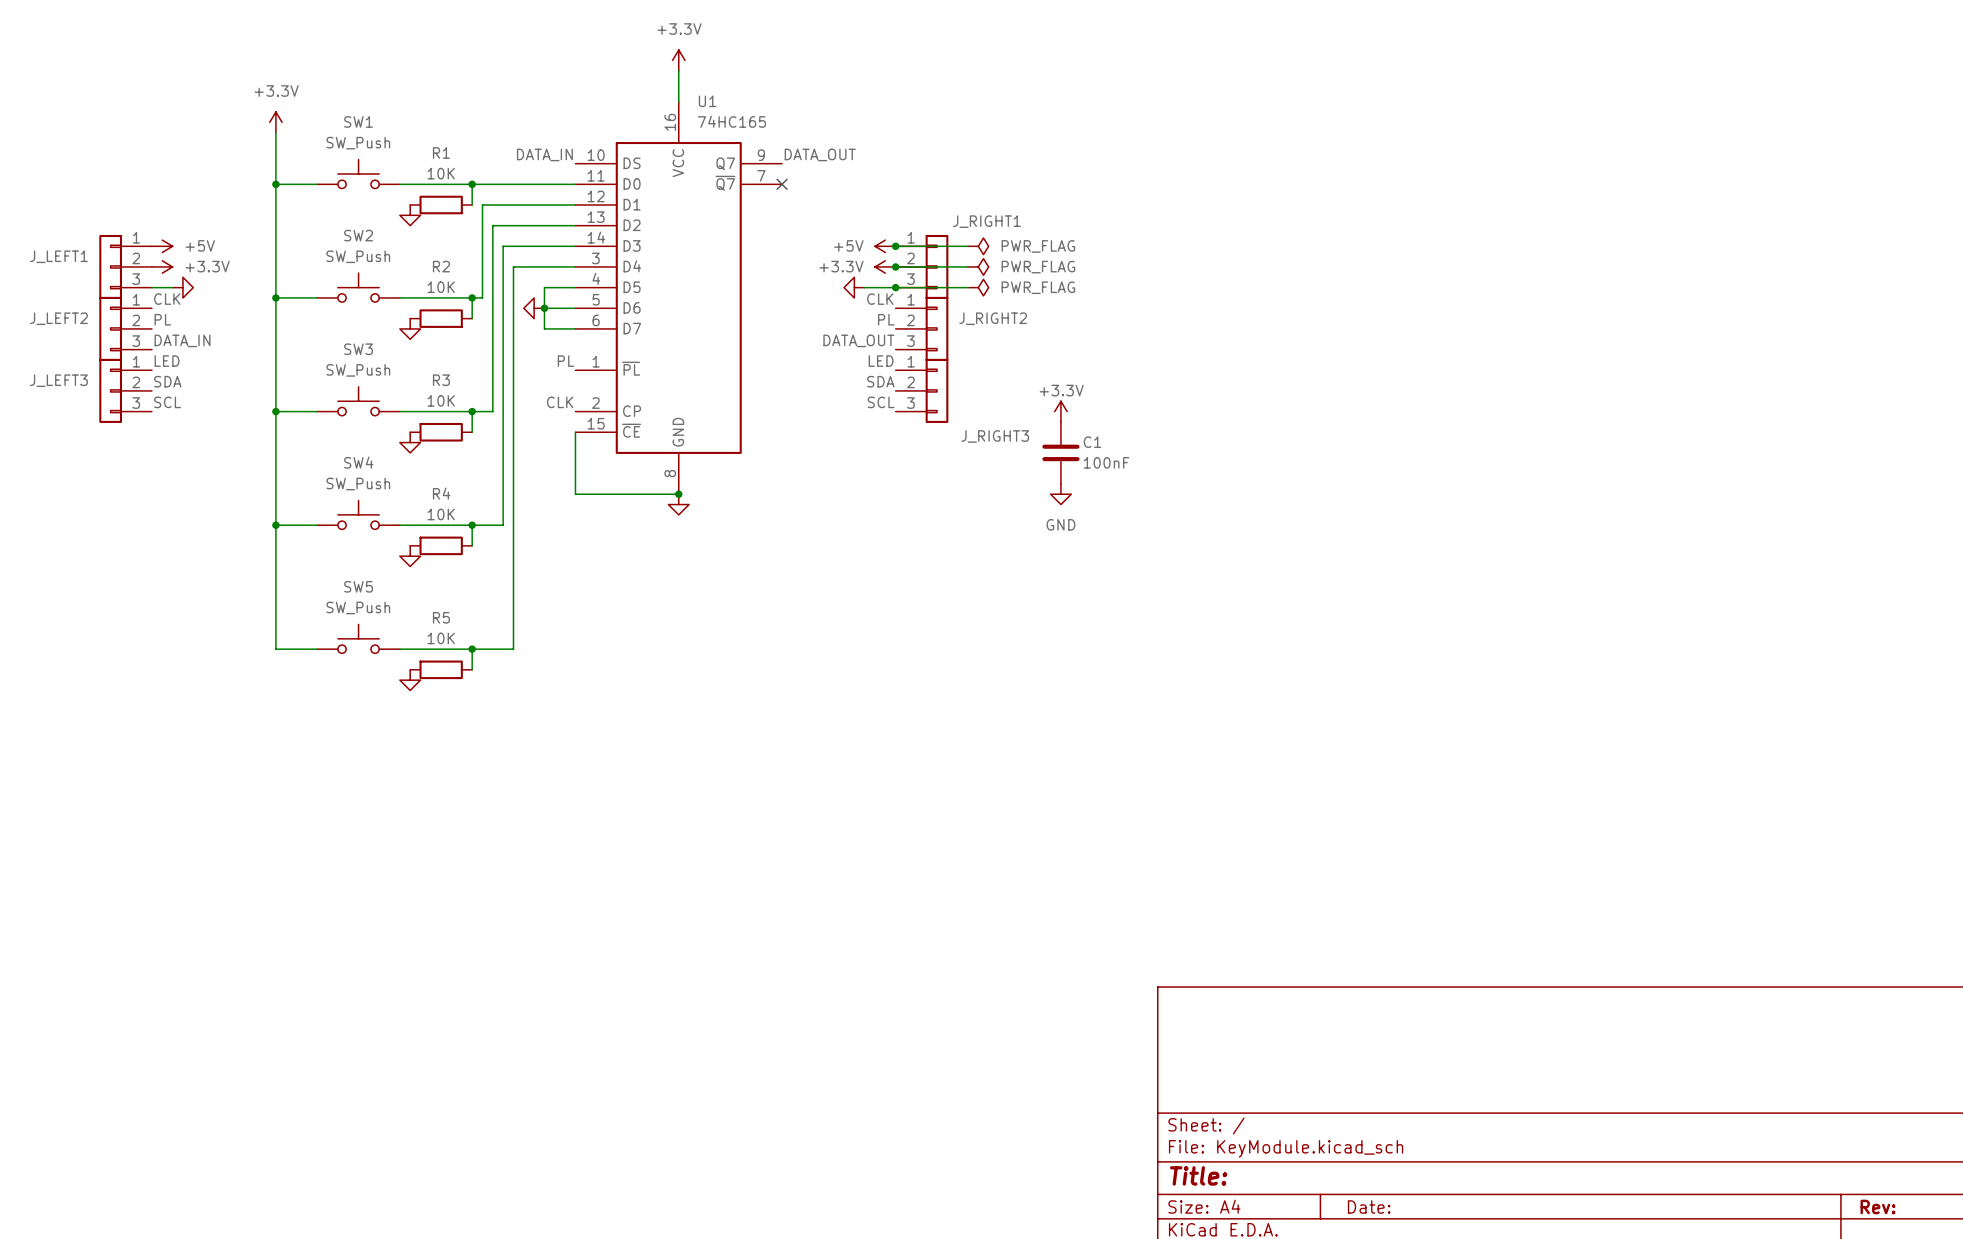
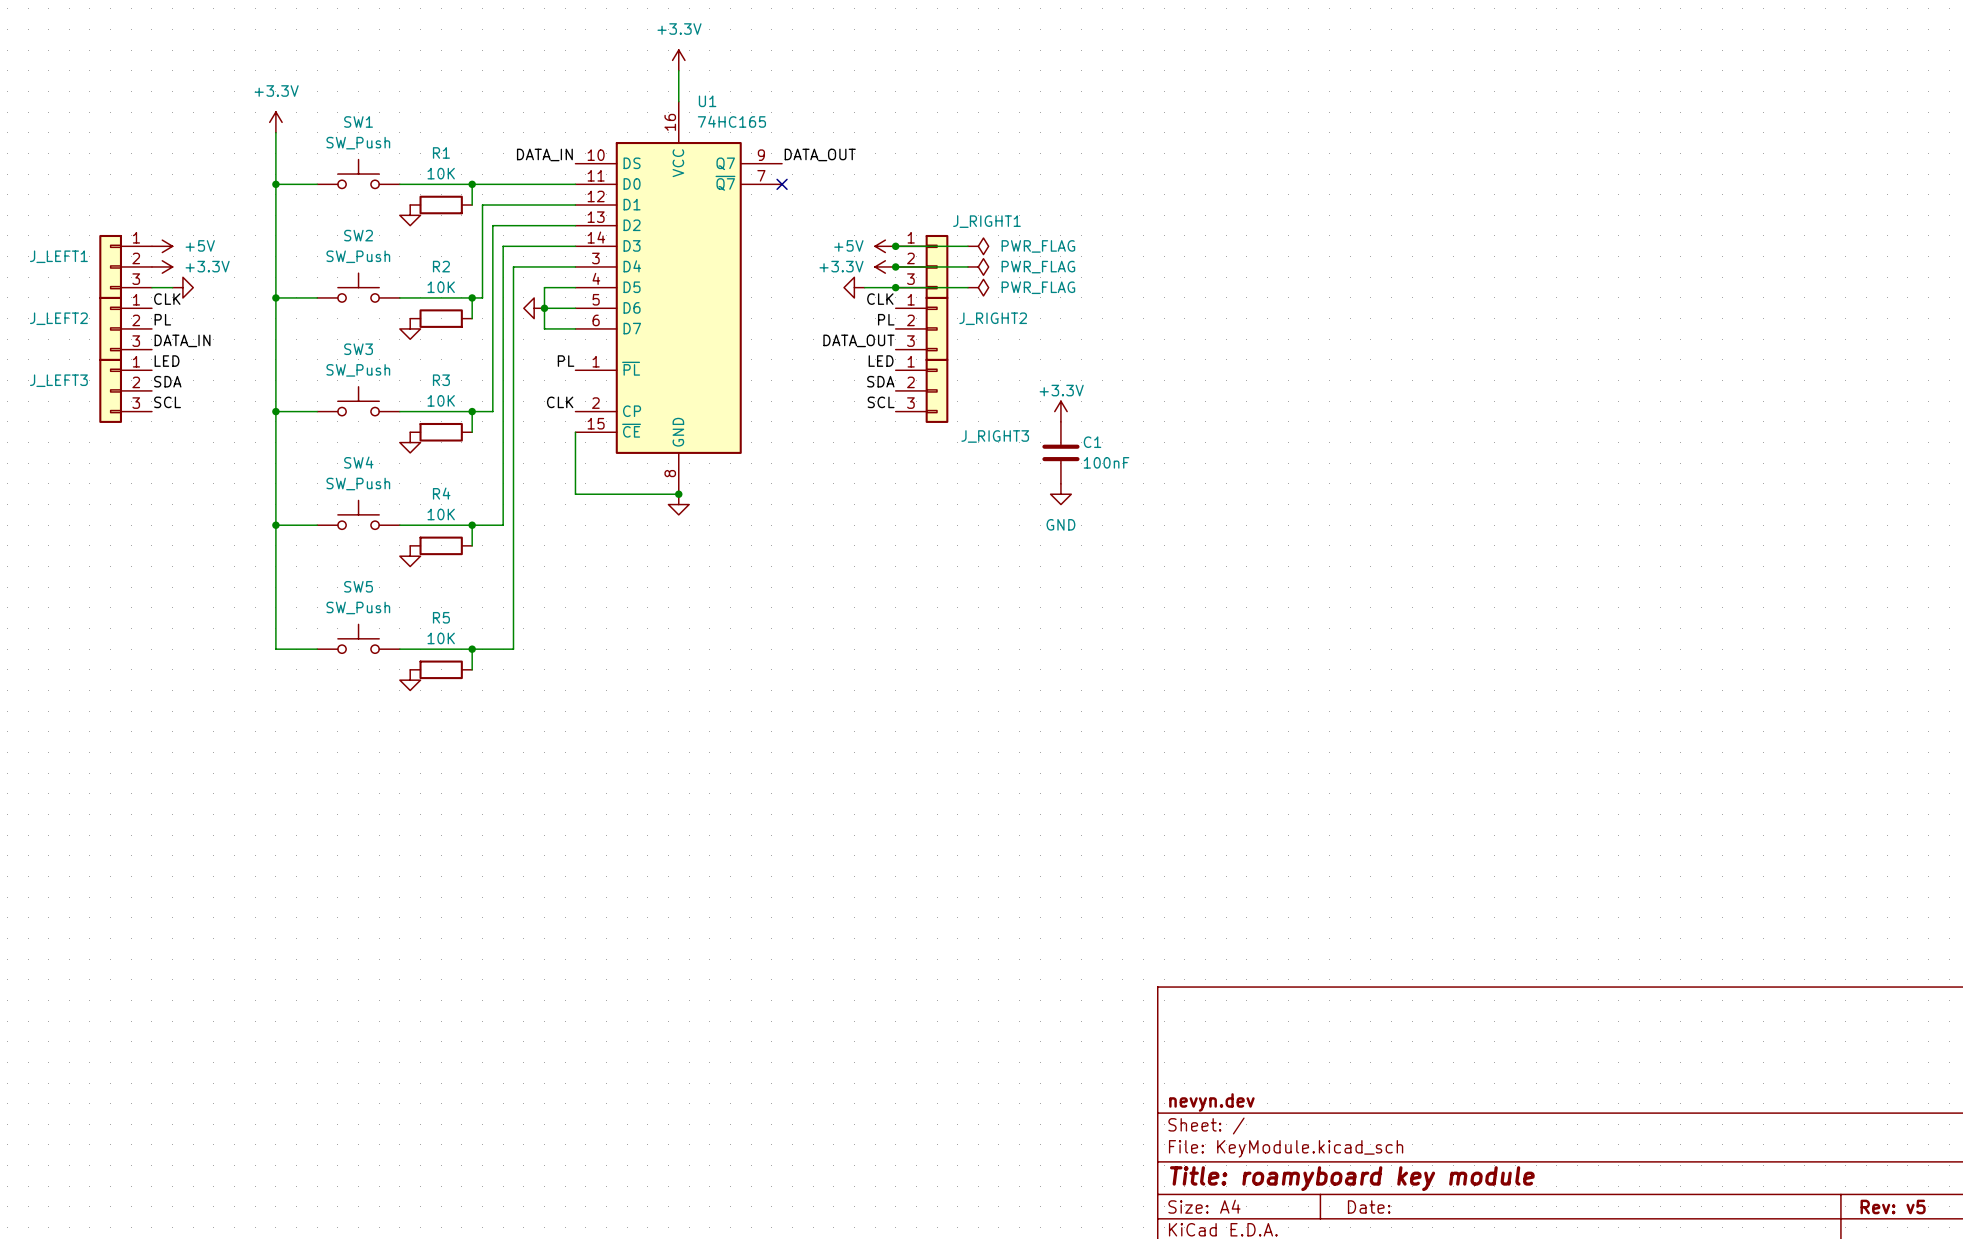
title block: none -> nevyn.dev (1211, 1102)
title block: Title: (1198, 1175) -> Title: roamyboard key module (1352, 1178)
title block: Rev: (1877, 1206) -> Rev: v5 (1893, 1206)

